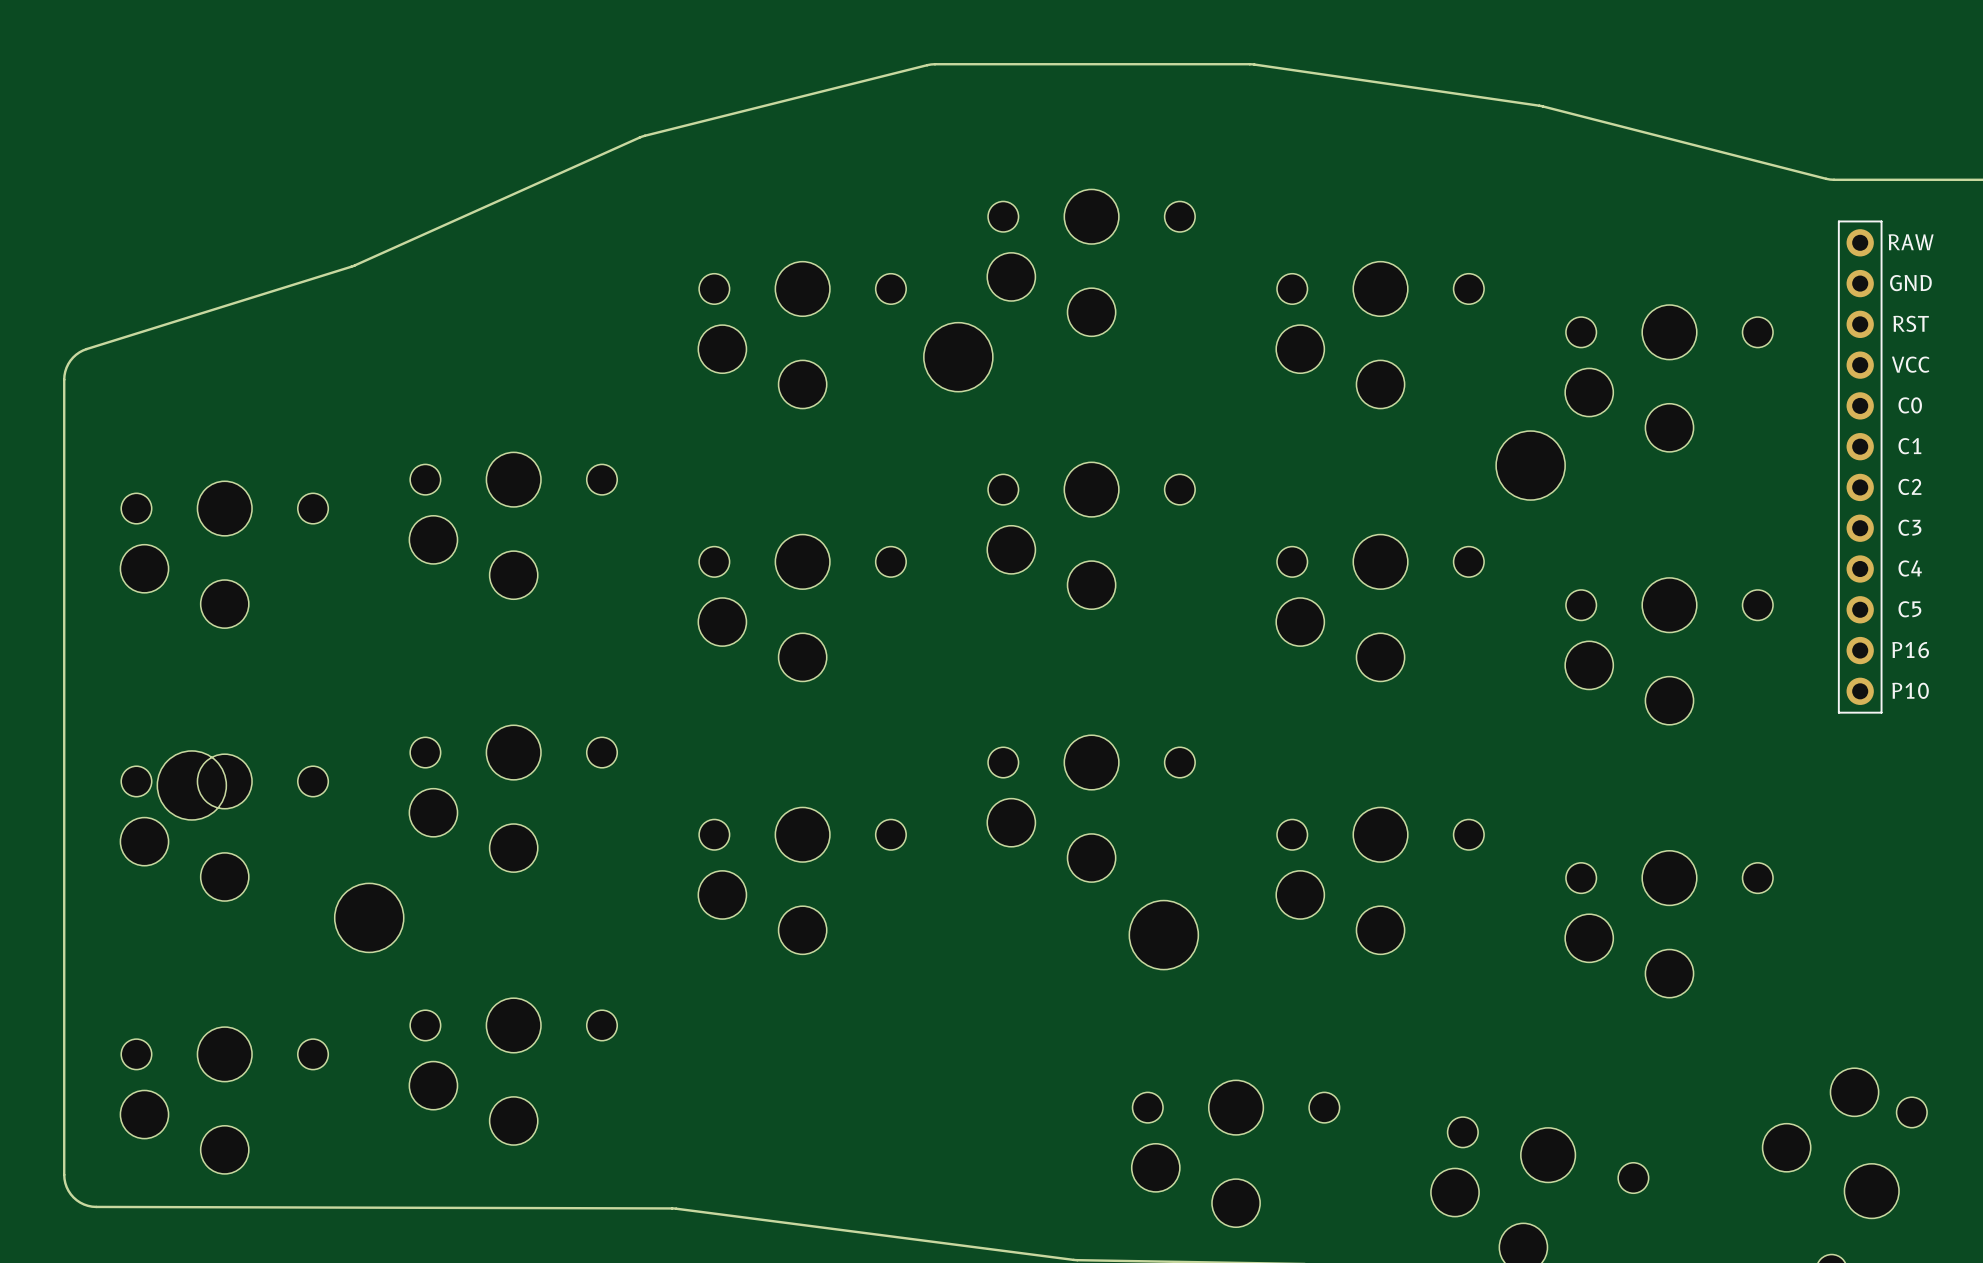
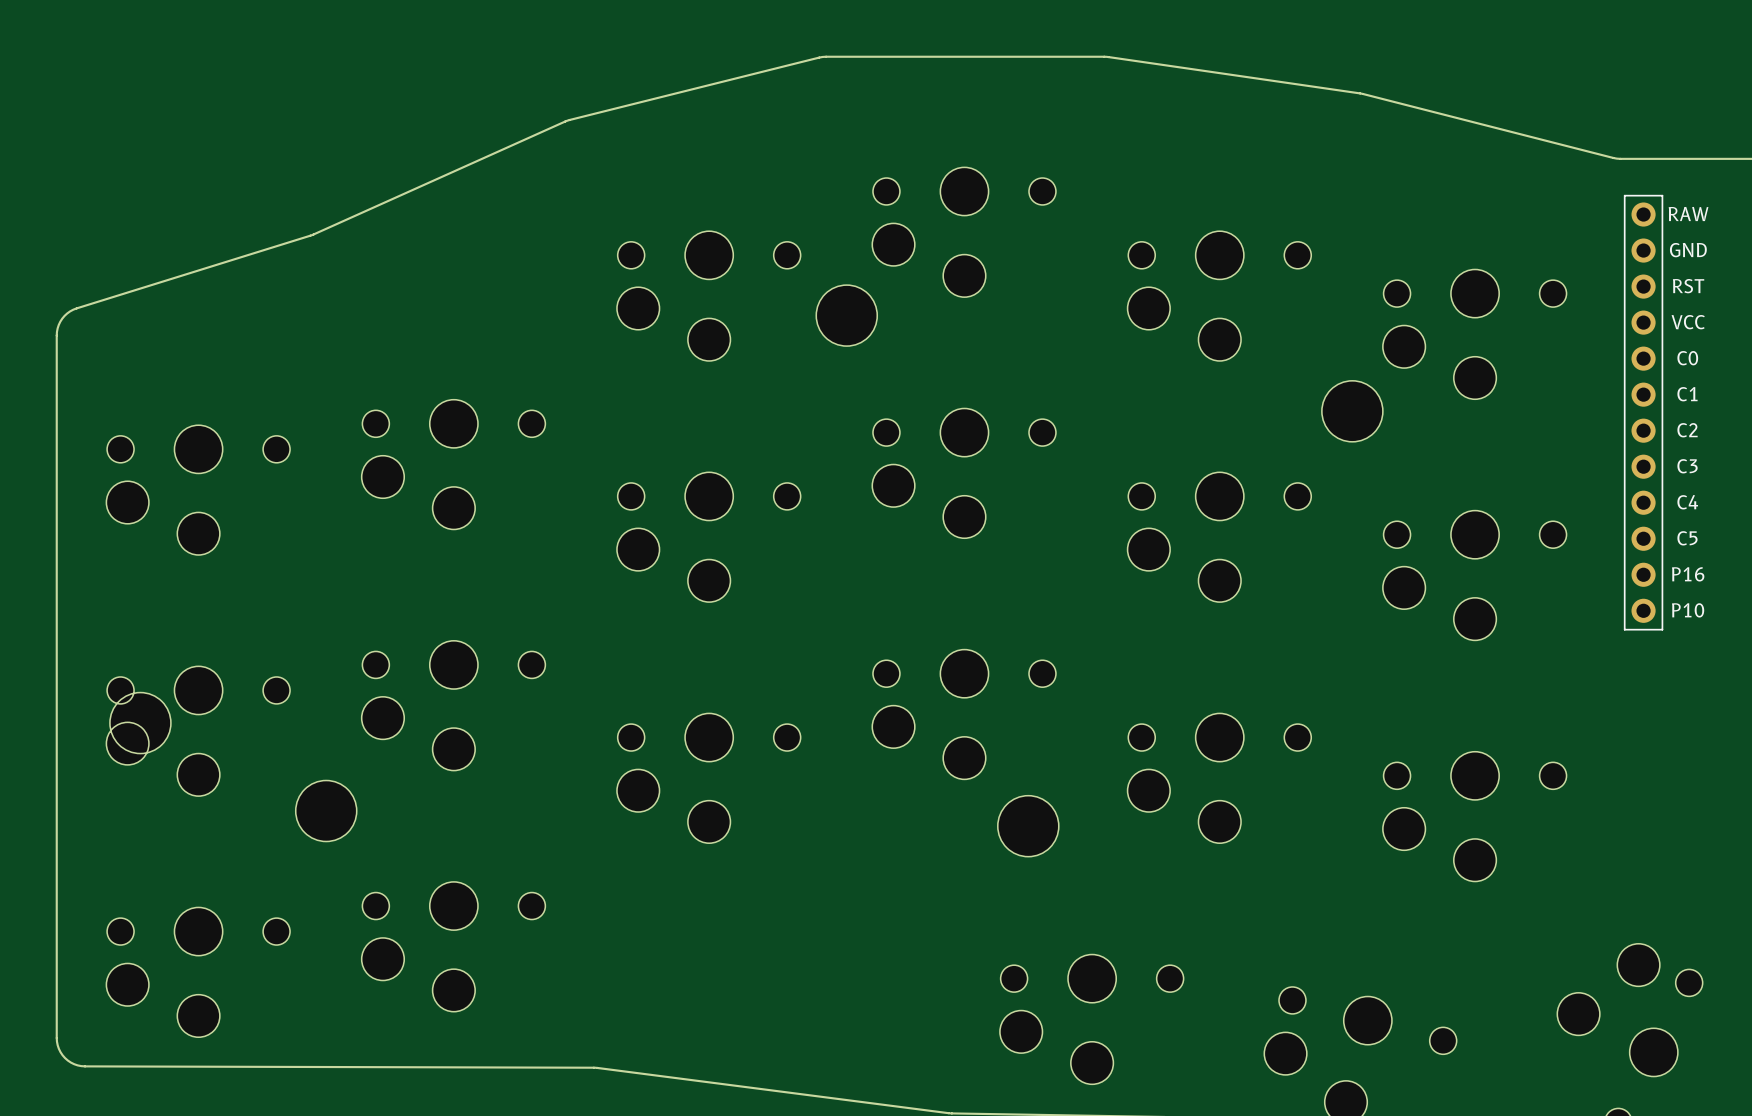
part position: (191, 785) -> (140, 723)

